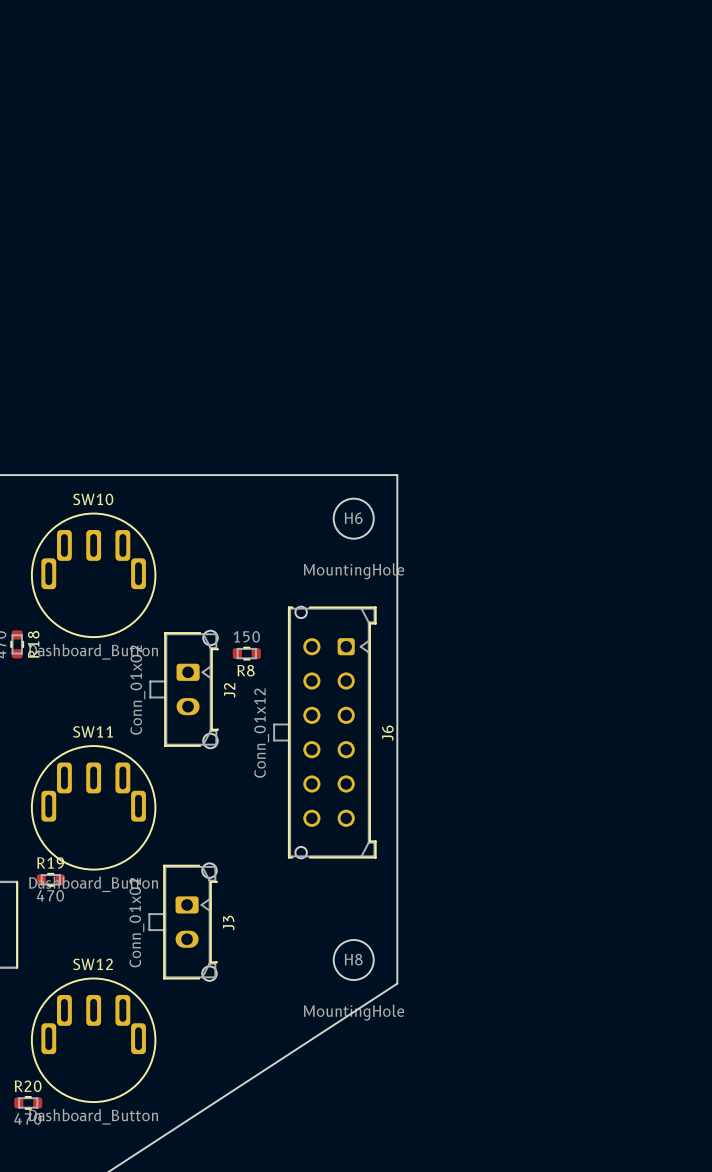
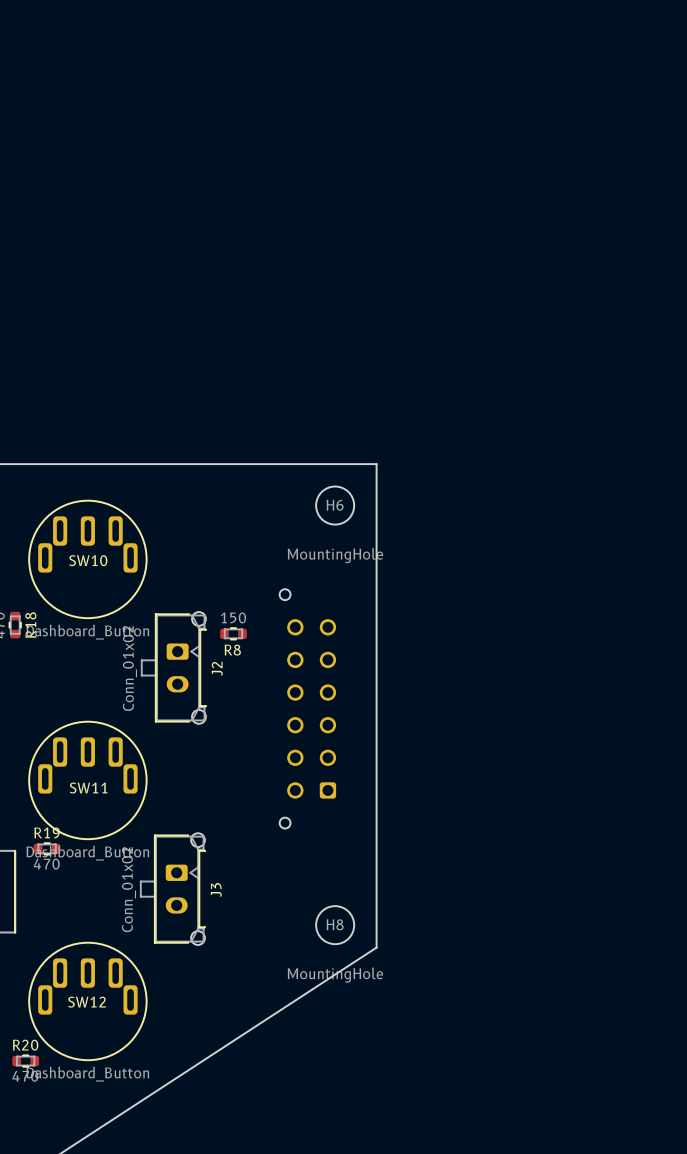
SW10 name position: SW10 (93, 499) -> SW10 (88, 560)
SW11 name position: SW11 (93, 731) -> SW11 (88, 788)
J6 side: top (324, 732) -> bottom (307, 708)
SW12 name position: SW12 (93, 964) -> SW12 (87, 1002)

